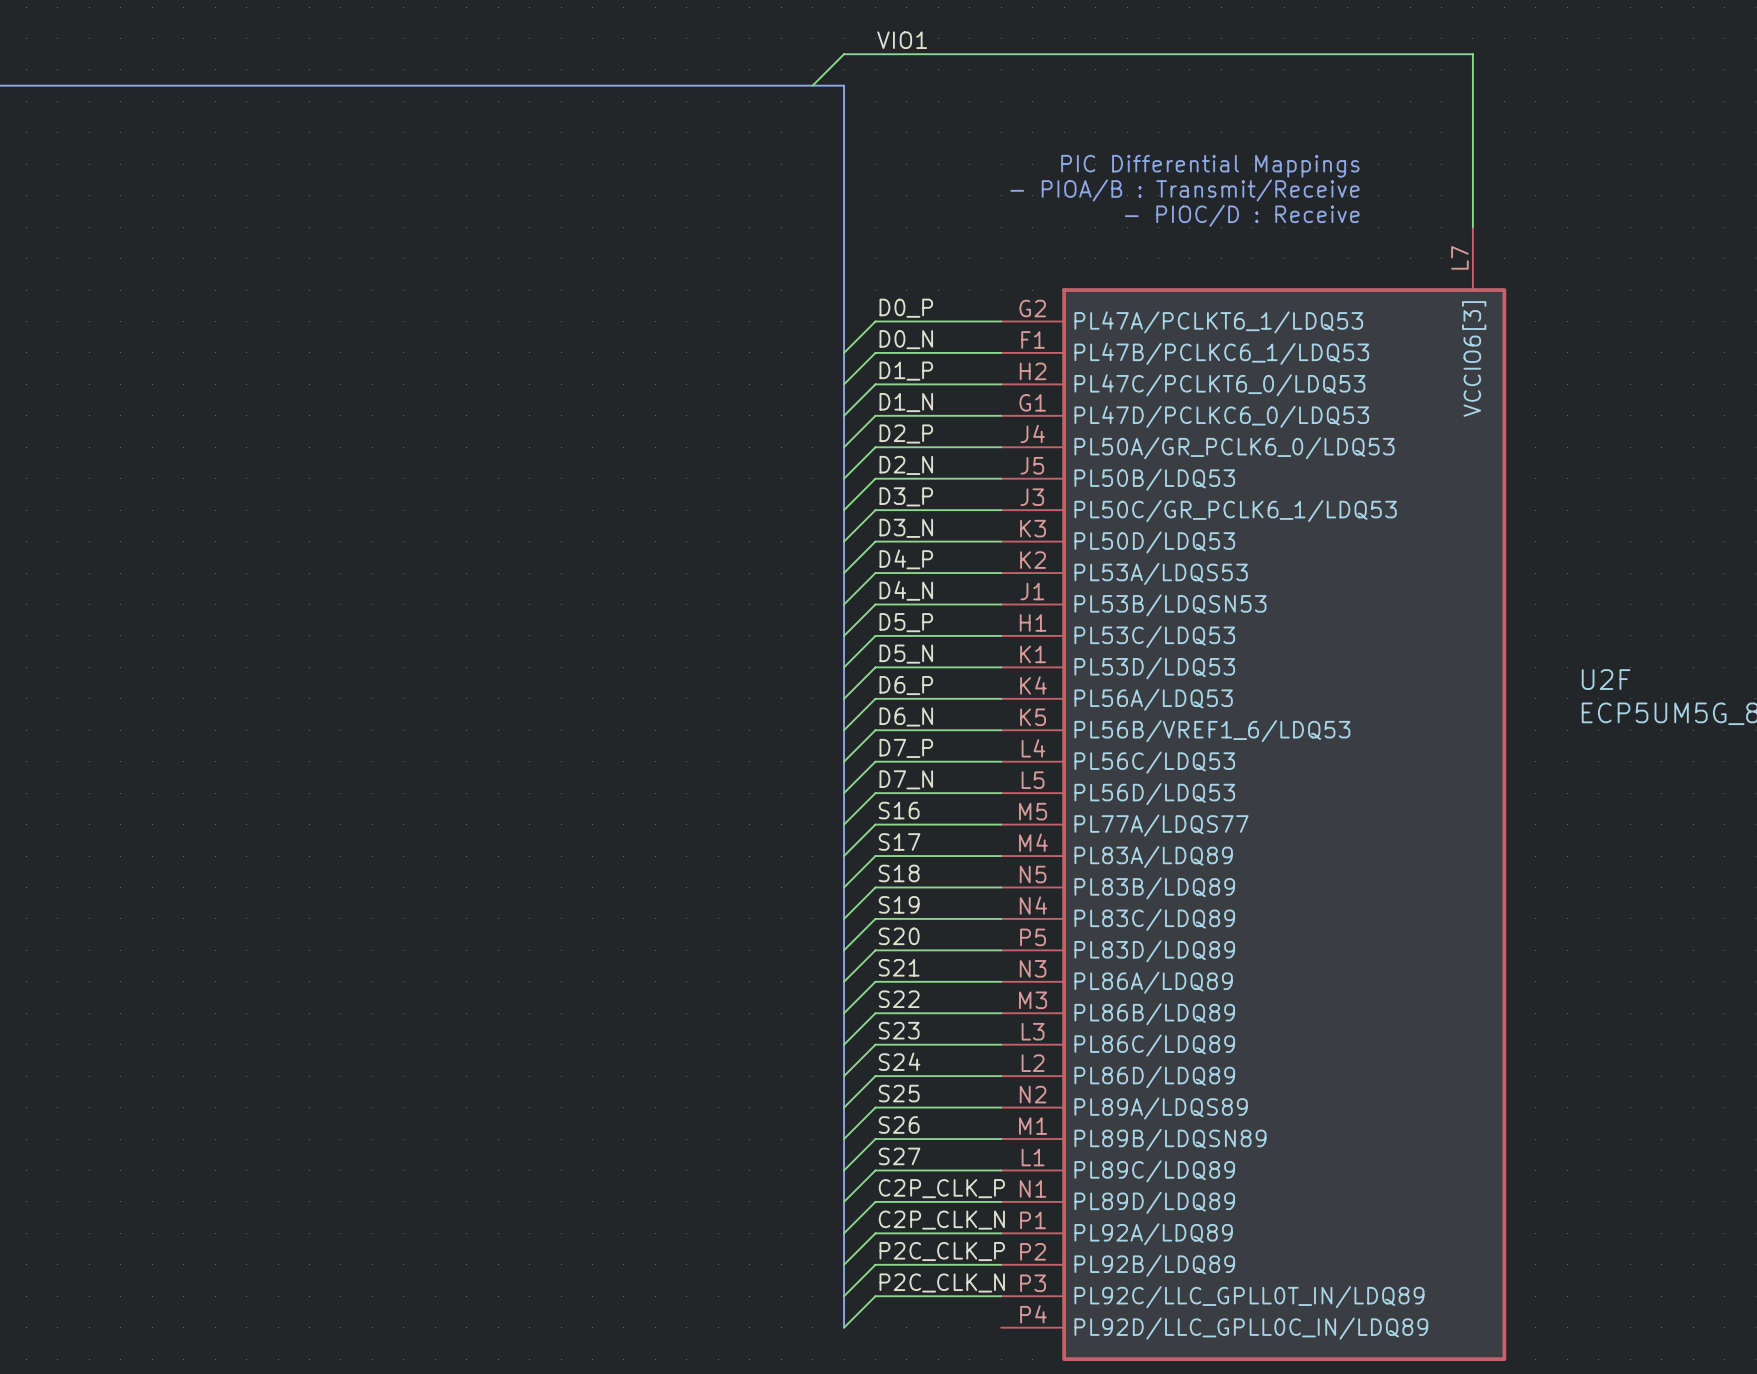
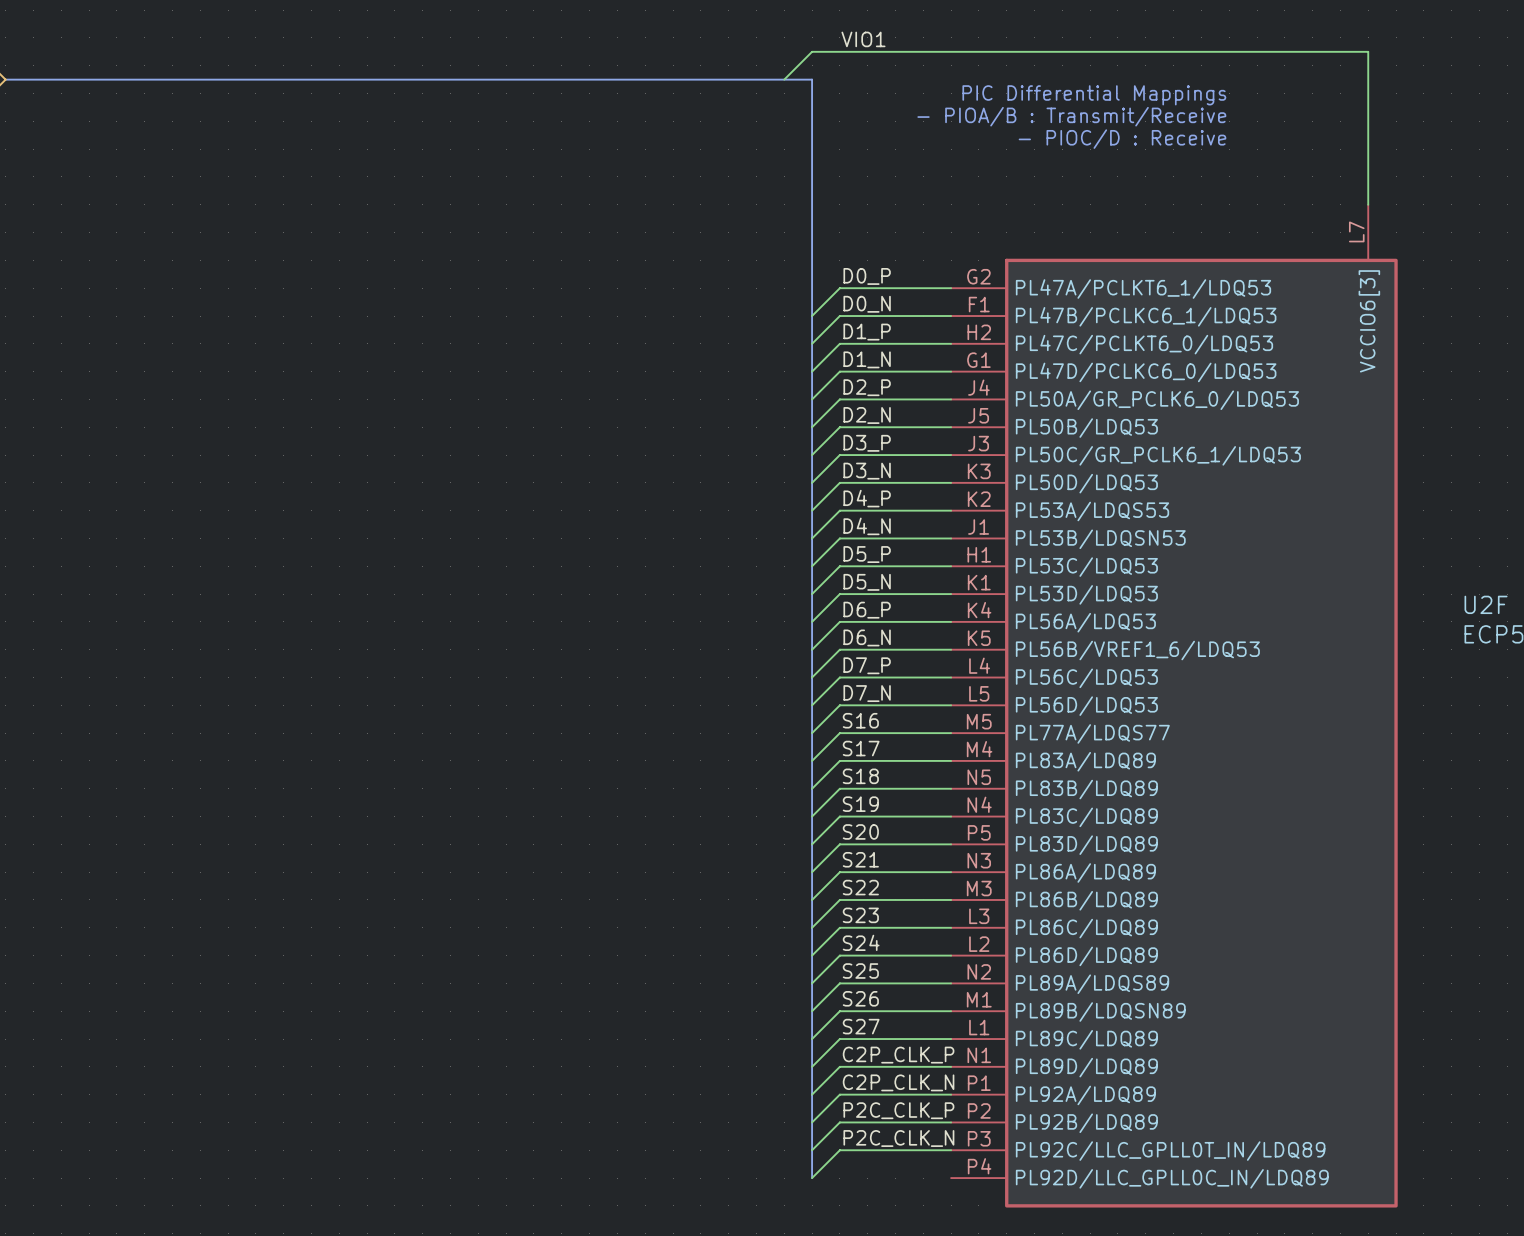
text position: PIC Differential Mappings (1210, 166) -> PIC Differential Mappings (1094, 95)
text position: - PIOA/B : Transmit/Receive (1184, 190) -> - PIOA/B : Transmit/Receive (1071, 116)
text position: - PIOC/D : Receive (1242, 215) -> - PIOC/D : Receive (1122, 139)

